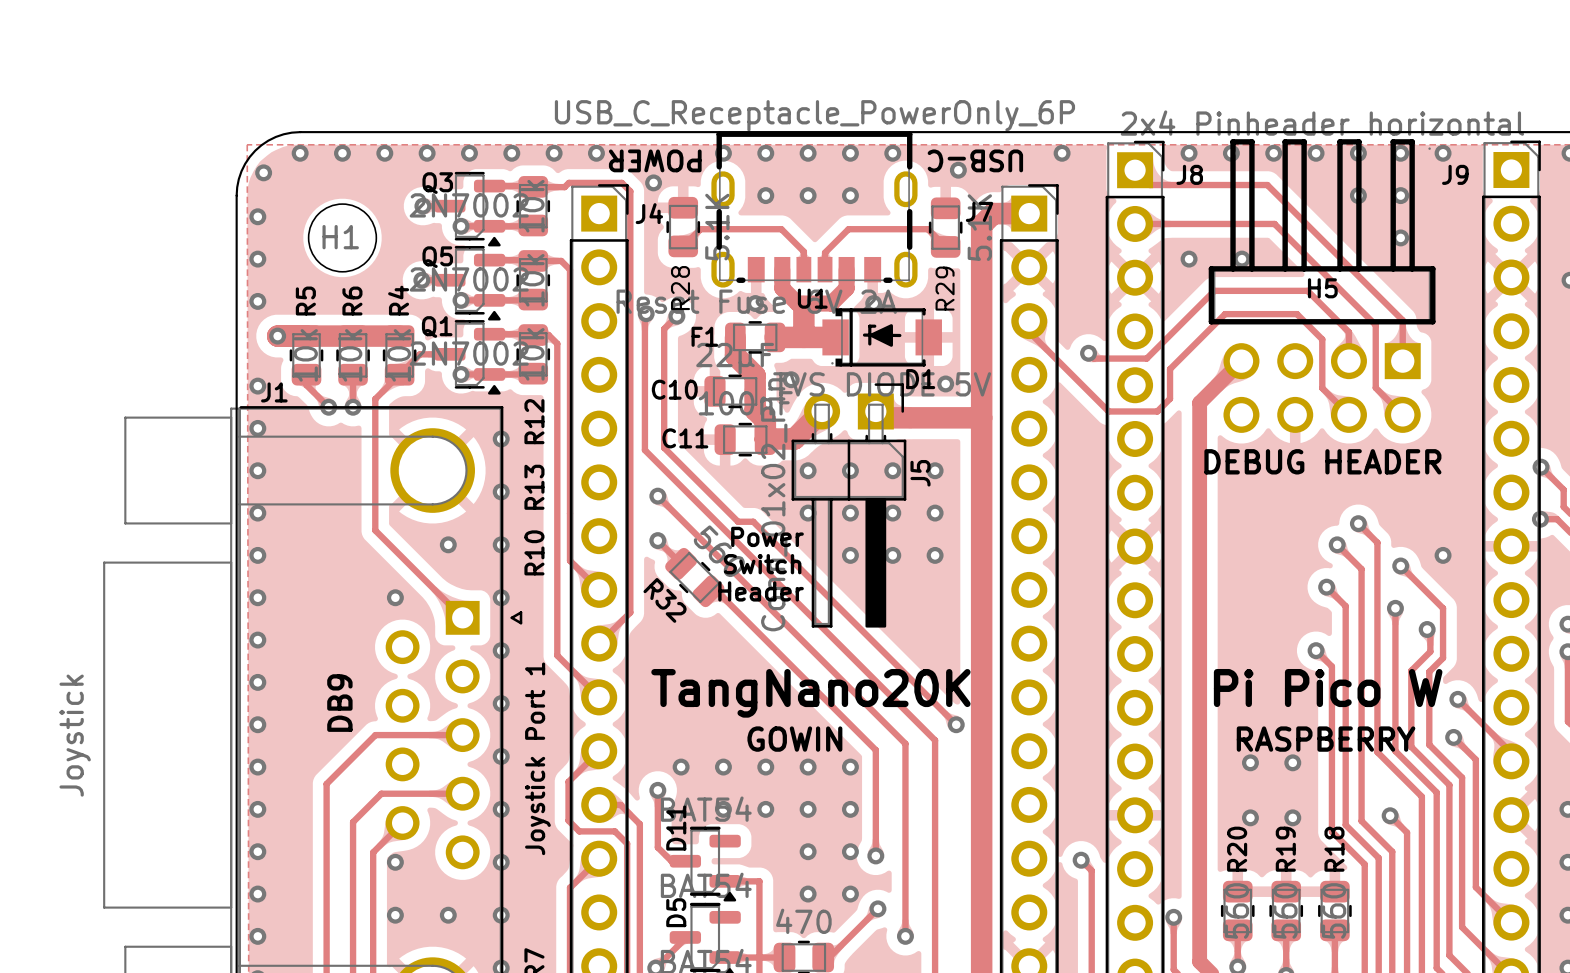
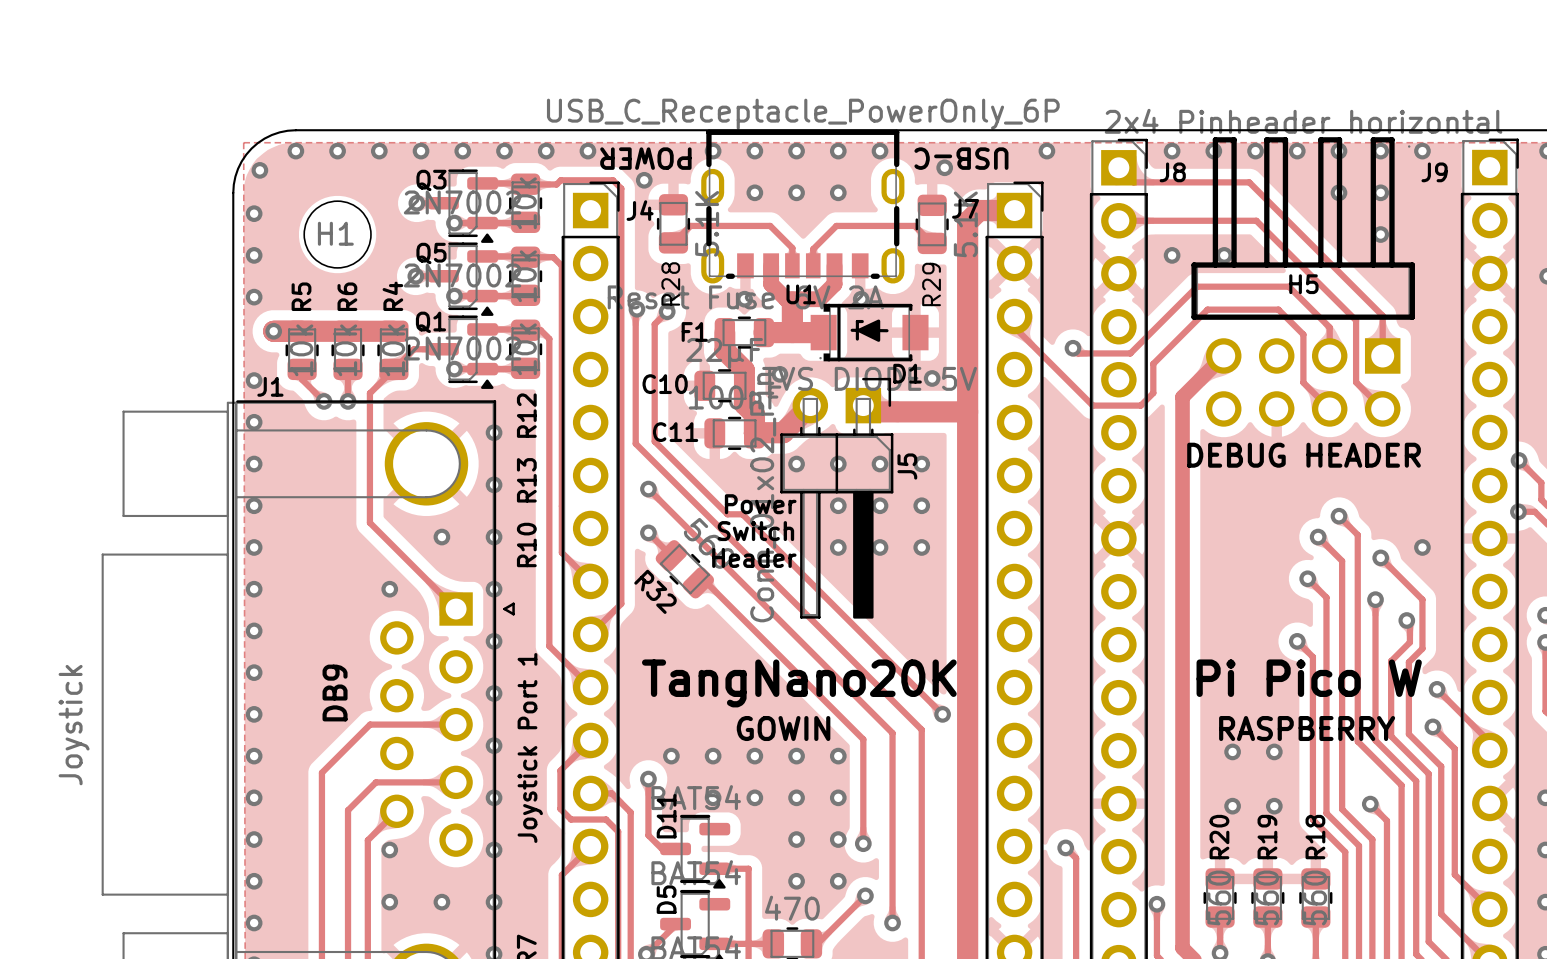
text: none -> Power (760, 504)
via: (808, 513) -> none
text: Power (767, 536) -> Switch (755, 531)
text: Switch (762, 564) -> Header (754, 557)
text: Header (761, 591) -> none

